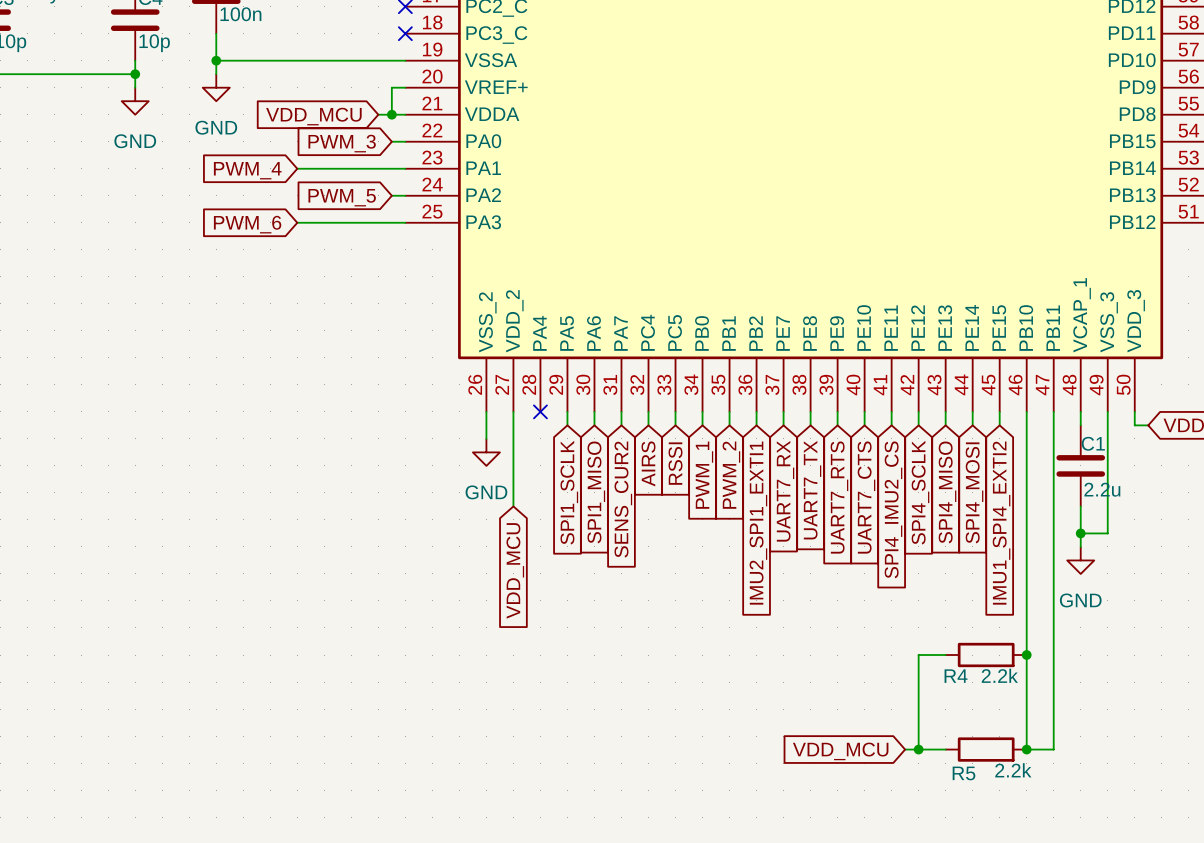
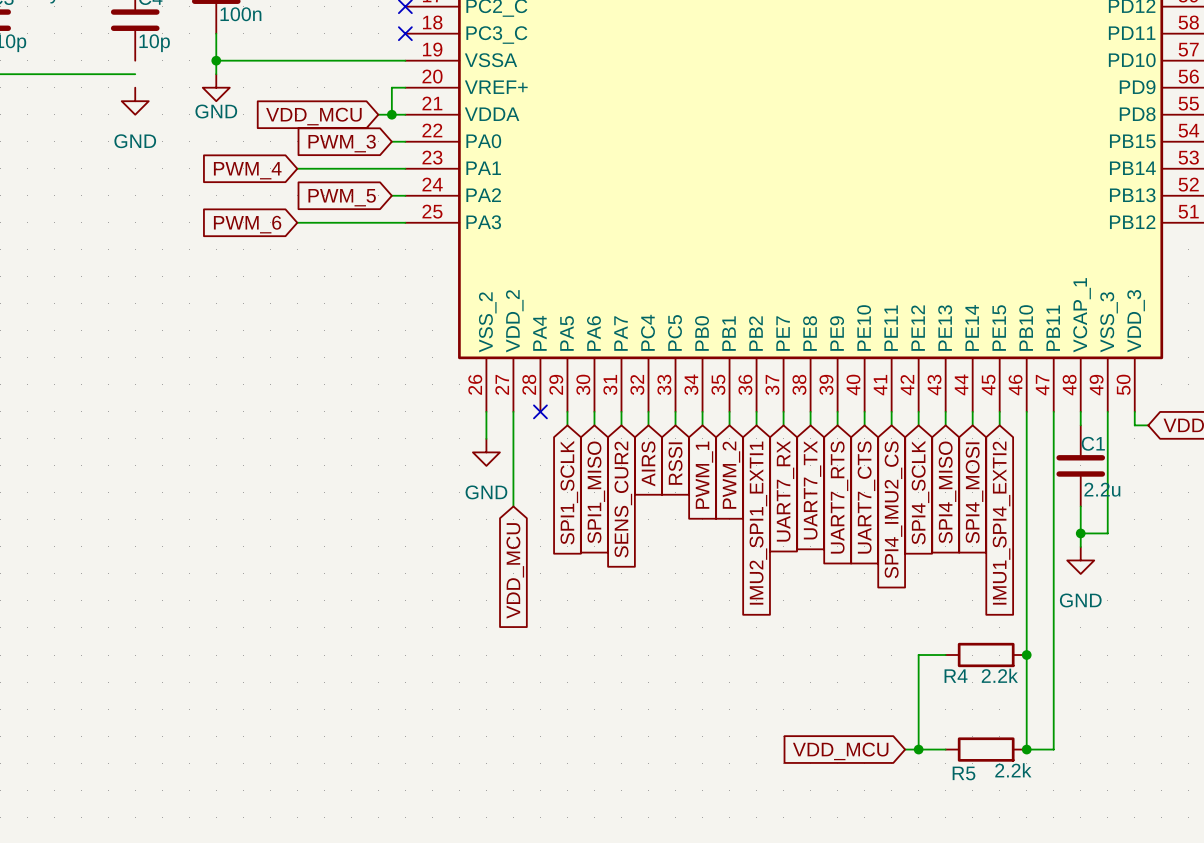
wire: (135, 60) (135, 87) -> none
junction: (135, 74) -> none
power symbol text position: GND (216, 127) -> GND (216, 111)

